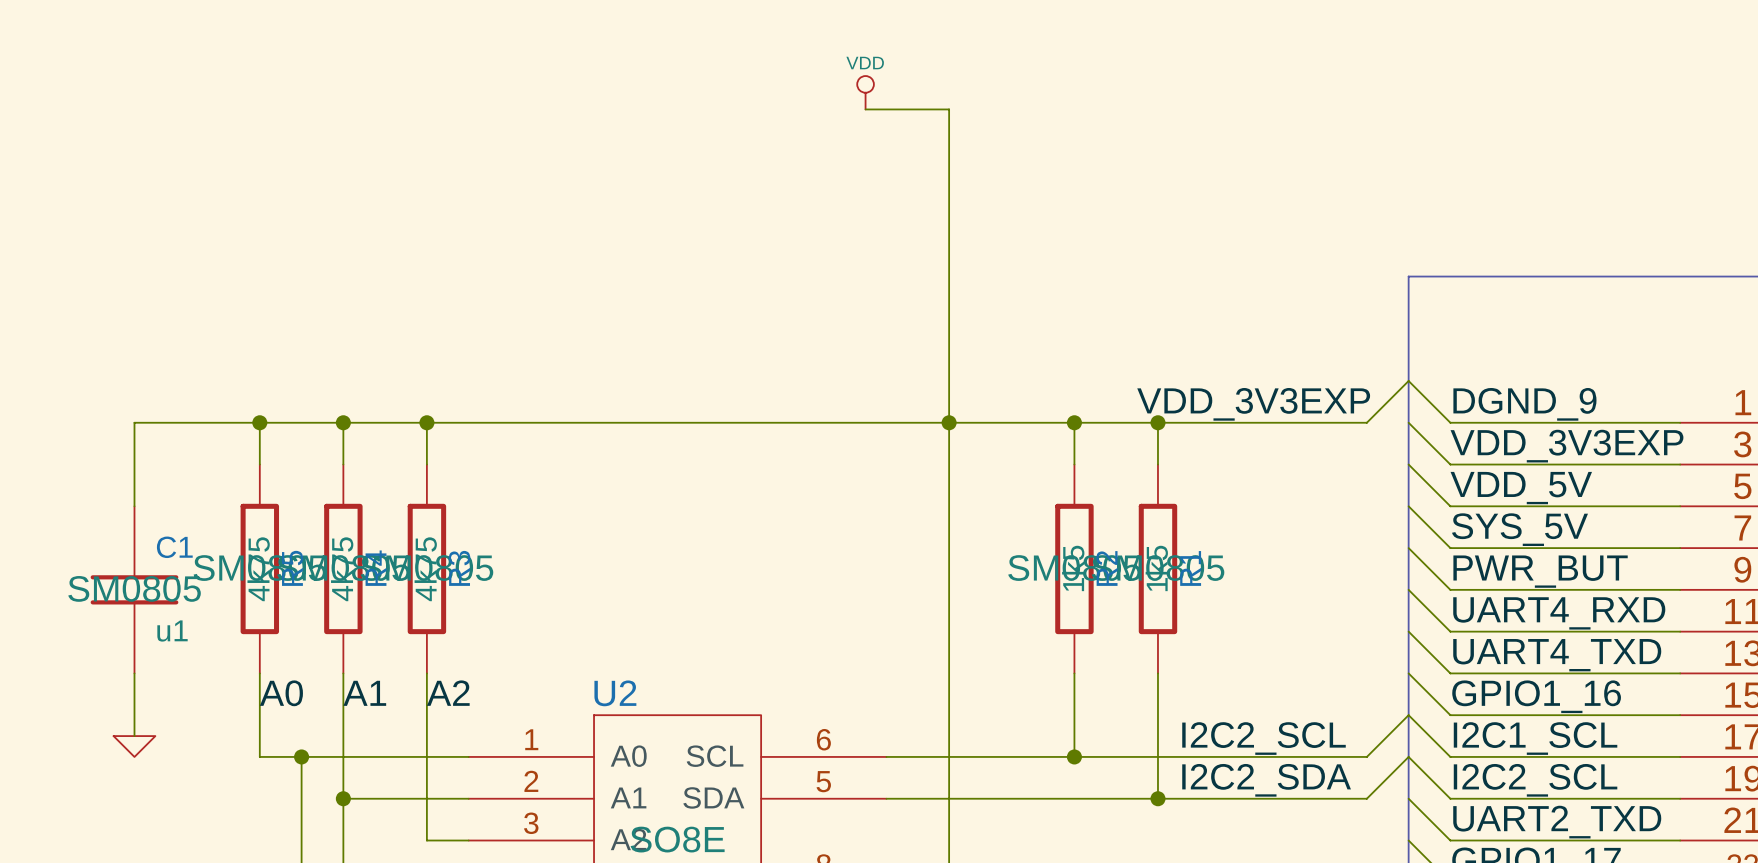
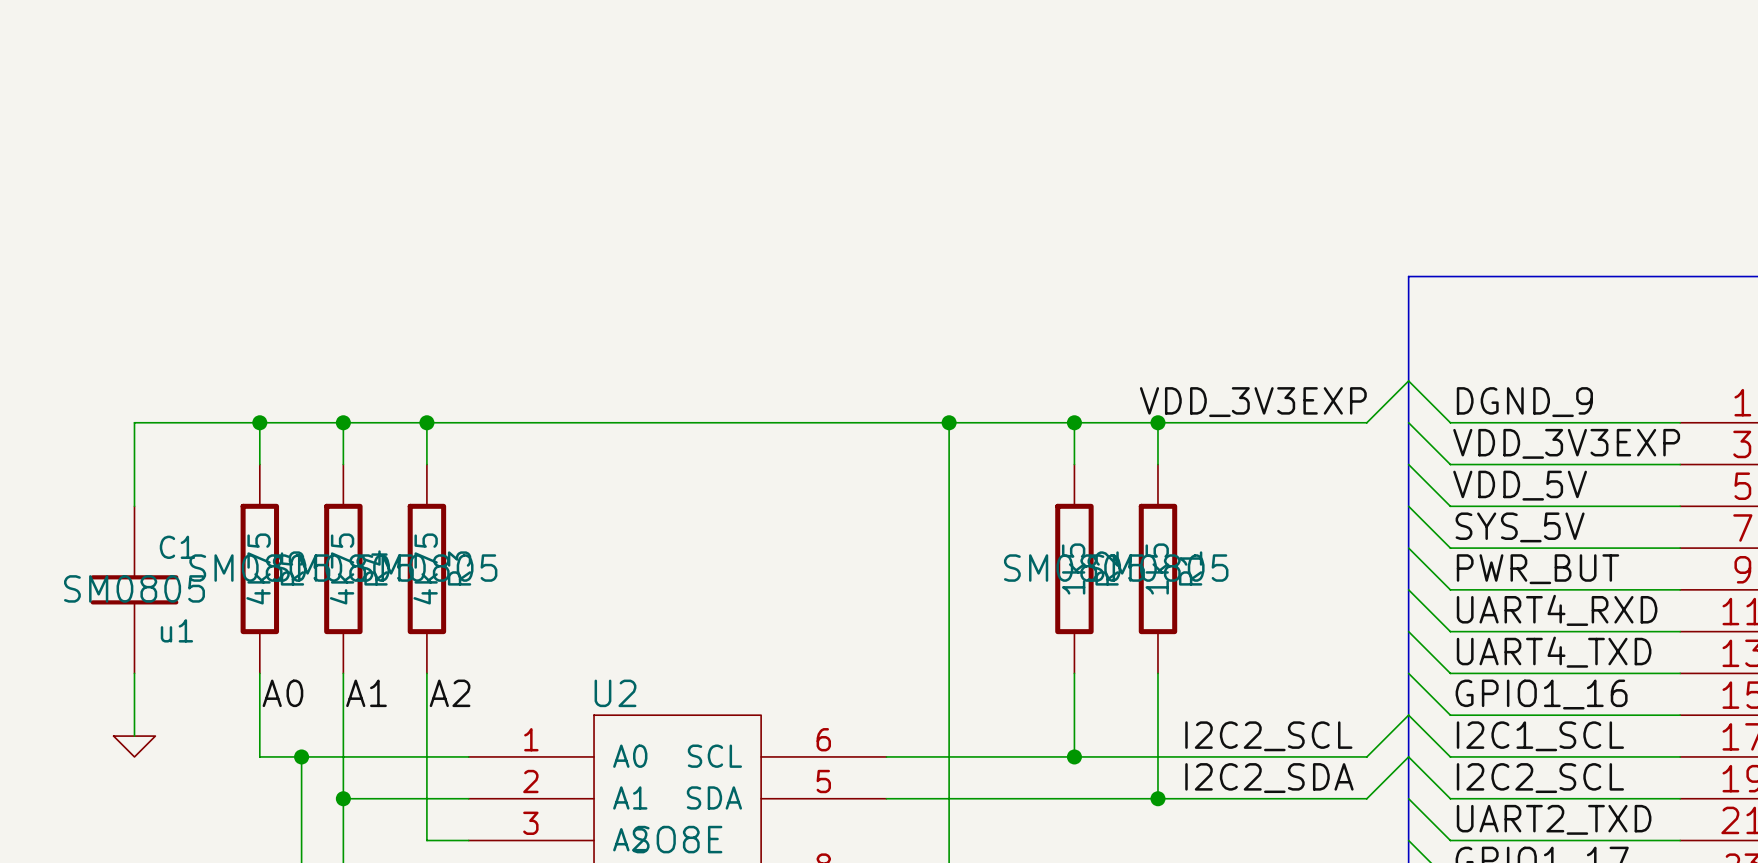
power symbol: VDD (865, 92) -> none
wire: (865, 109) (949, 109) (949, 422) -> none

